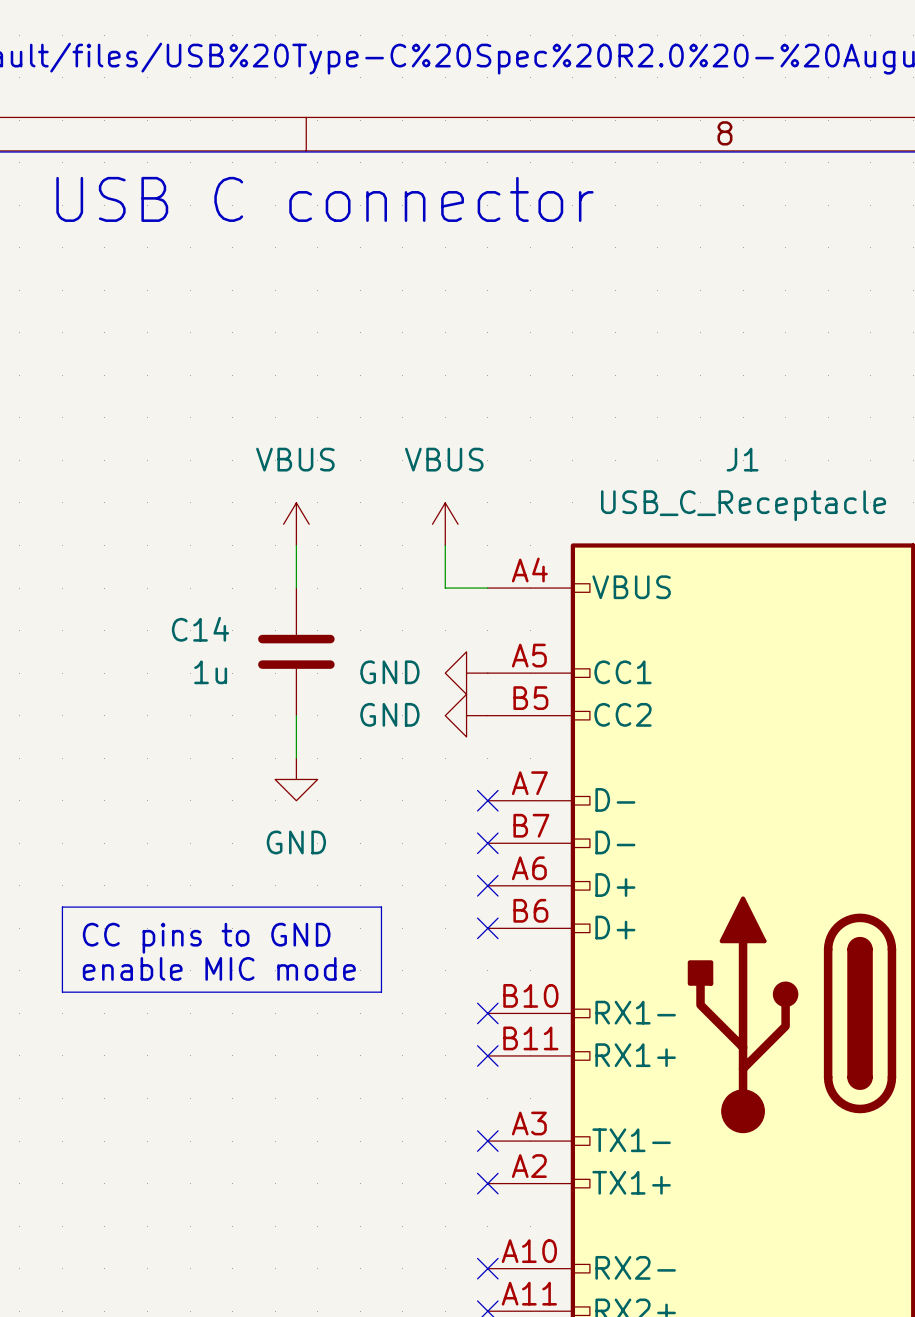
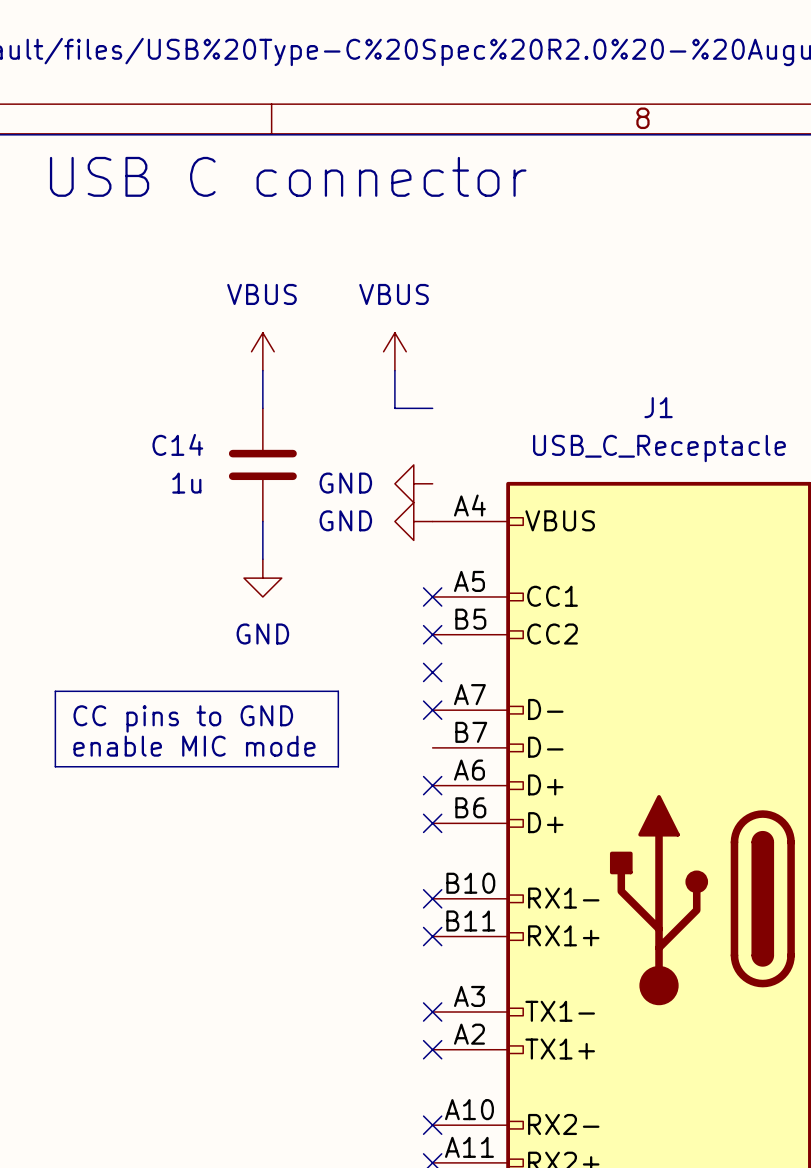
power symbol: none -> VBUS (262, 351)
power symbol: none -> VBUS (394, 351)
power symbol: VBUS (296, 524) -> none
power symbol: VBUS (445, 524) -> none
wire: (445, 545) (445, 588) (487, 588) -> (394, 370) (394, 408) (432, 408)
power symbol: none -> GND (413, 483)
power symbol: none -> GND (413, 521)
power symbol: none -> GND (262, 578)
C14 position: (296, 651) -> (262, 464)
power symbol: GND (466, 673) -> none
no-connect mark: none -> (432, 596)
wire: (296, 715) (296, 758) -> (262, 370) (262, 408)
power symbol: GND (466, 715) -> none
no-connect mark: none -> (432, 634)
no-connect mark: none -> (432, 672)
power symbol: GND (296, 779) -> none
no-connect mark: (487, 843) -> none
line: (62, 907) (381, 907) (381, 992) (62, 992) (62, 907) -> (55, 691) (338, 691) (338, 766) (55, 766) (55, 691)
text position: CC pins to GND (206, 938) -> CC pins to GND (183, 718)
text position: enable MIC mode (219, 968) -> enable MIC mode (194, 746)

